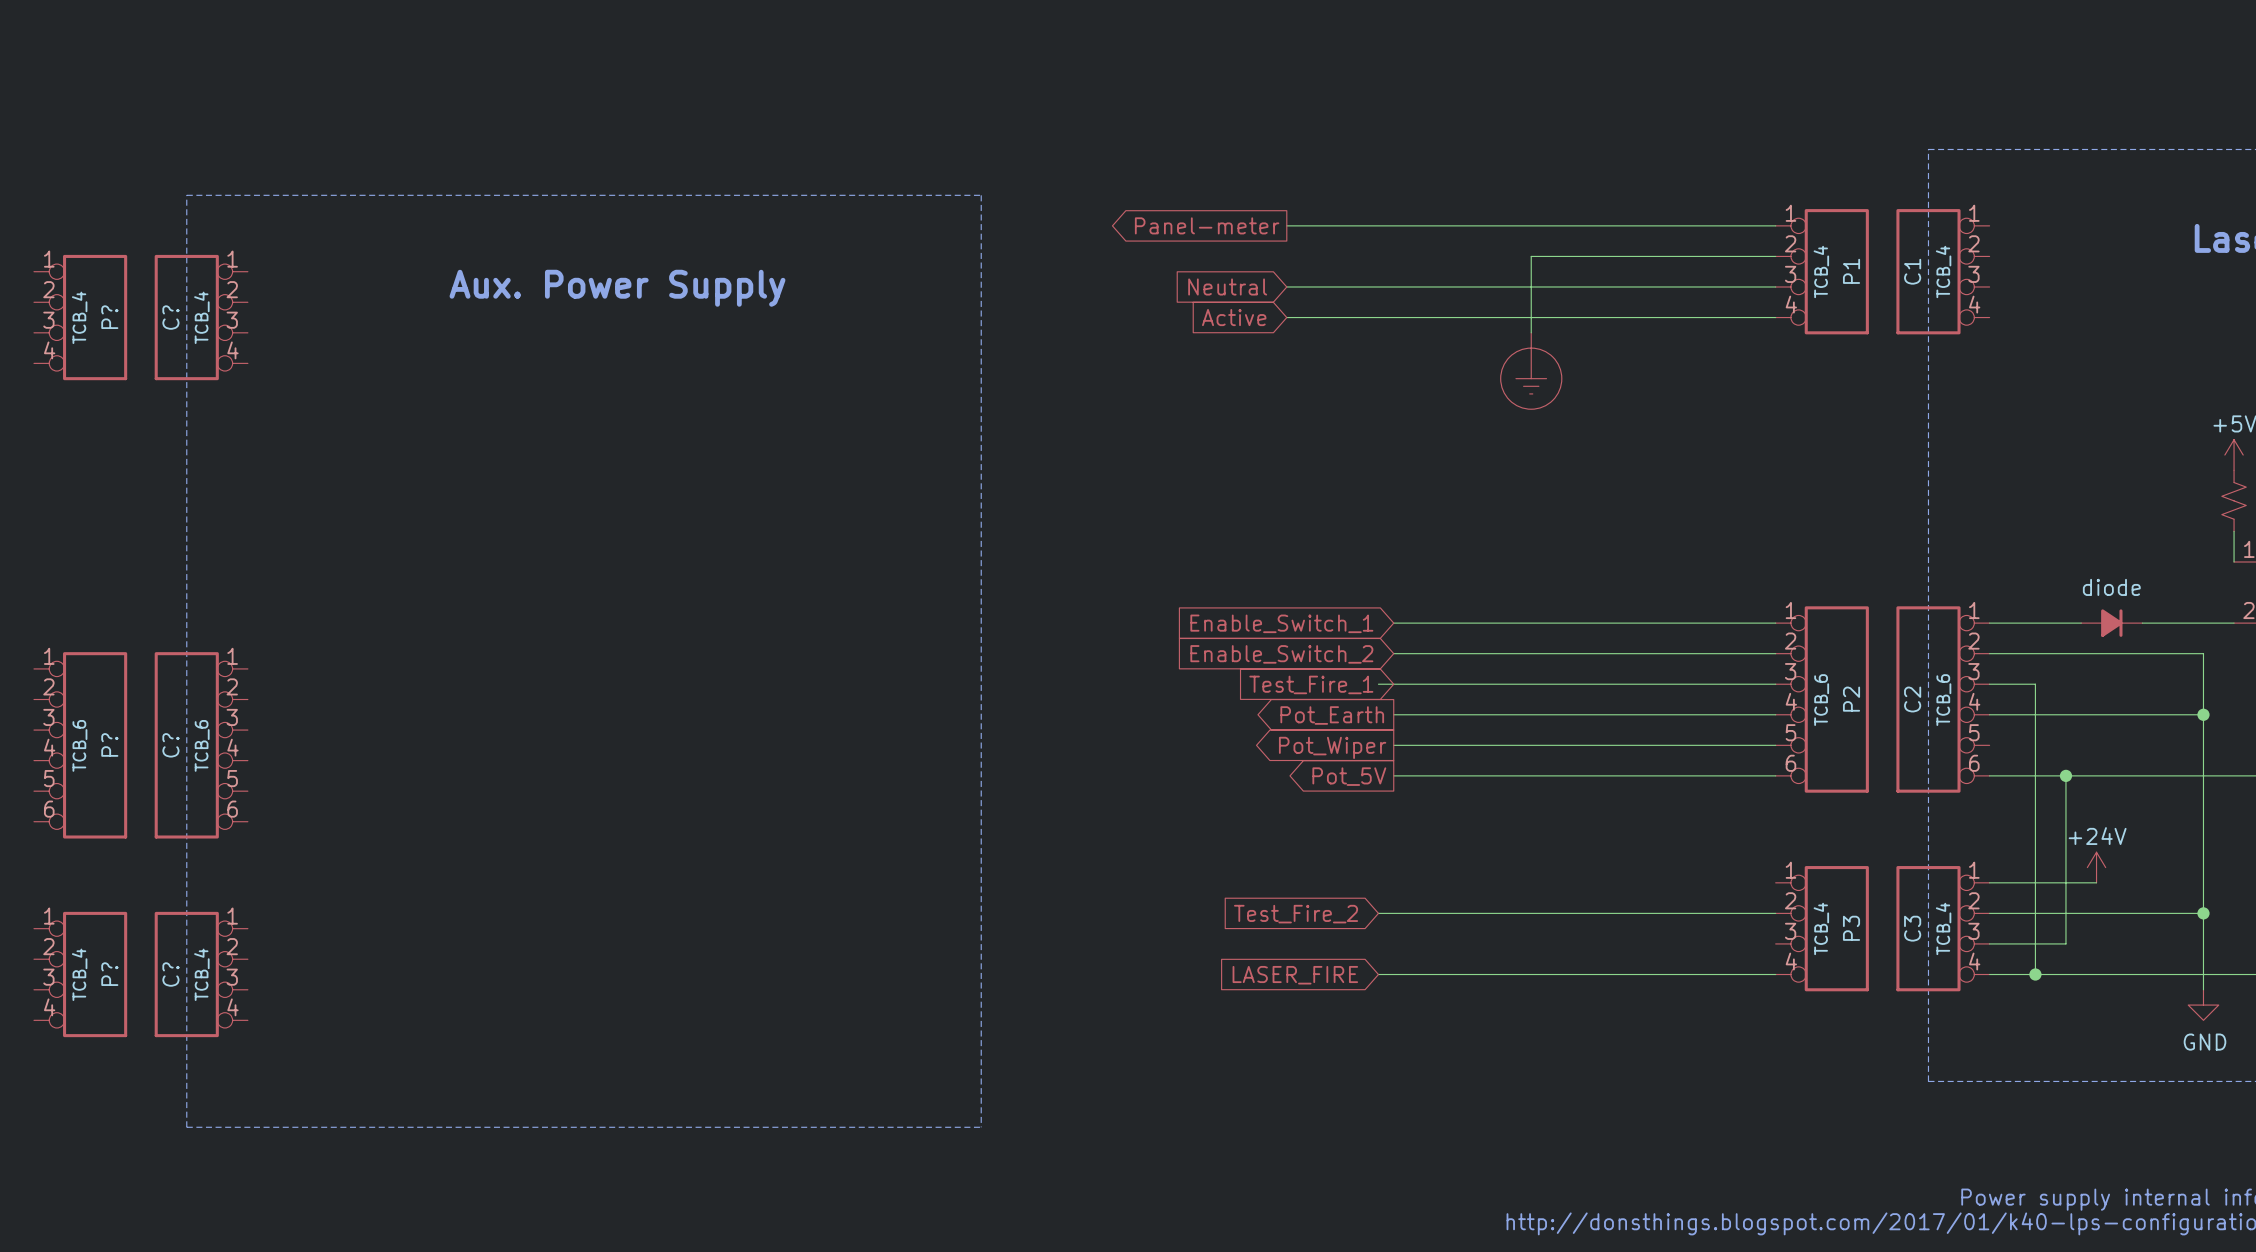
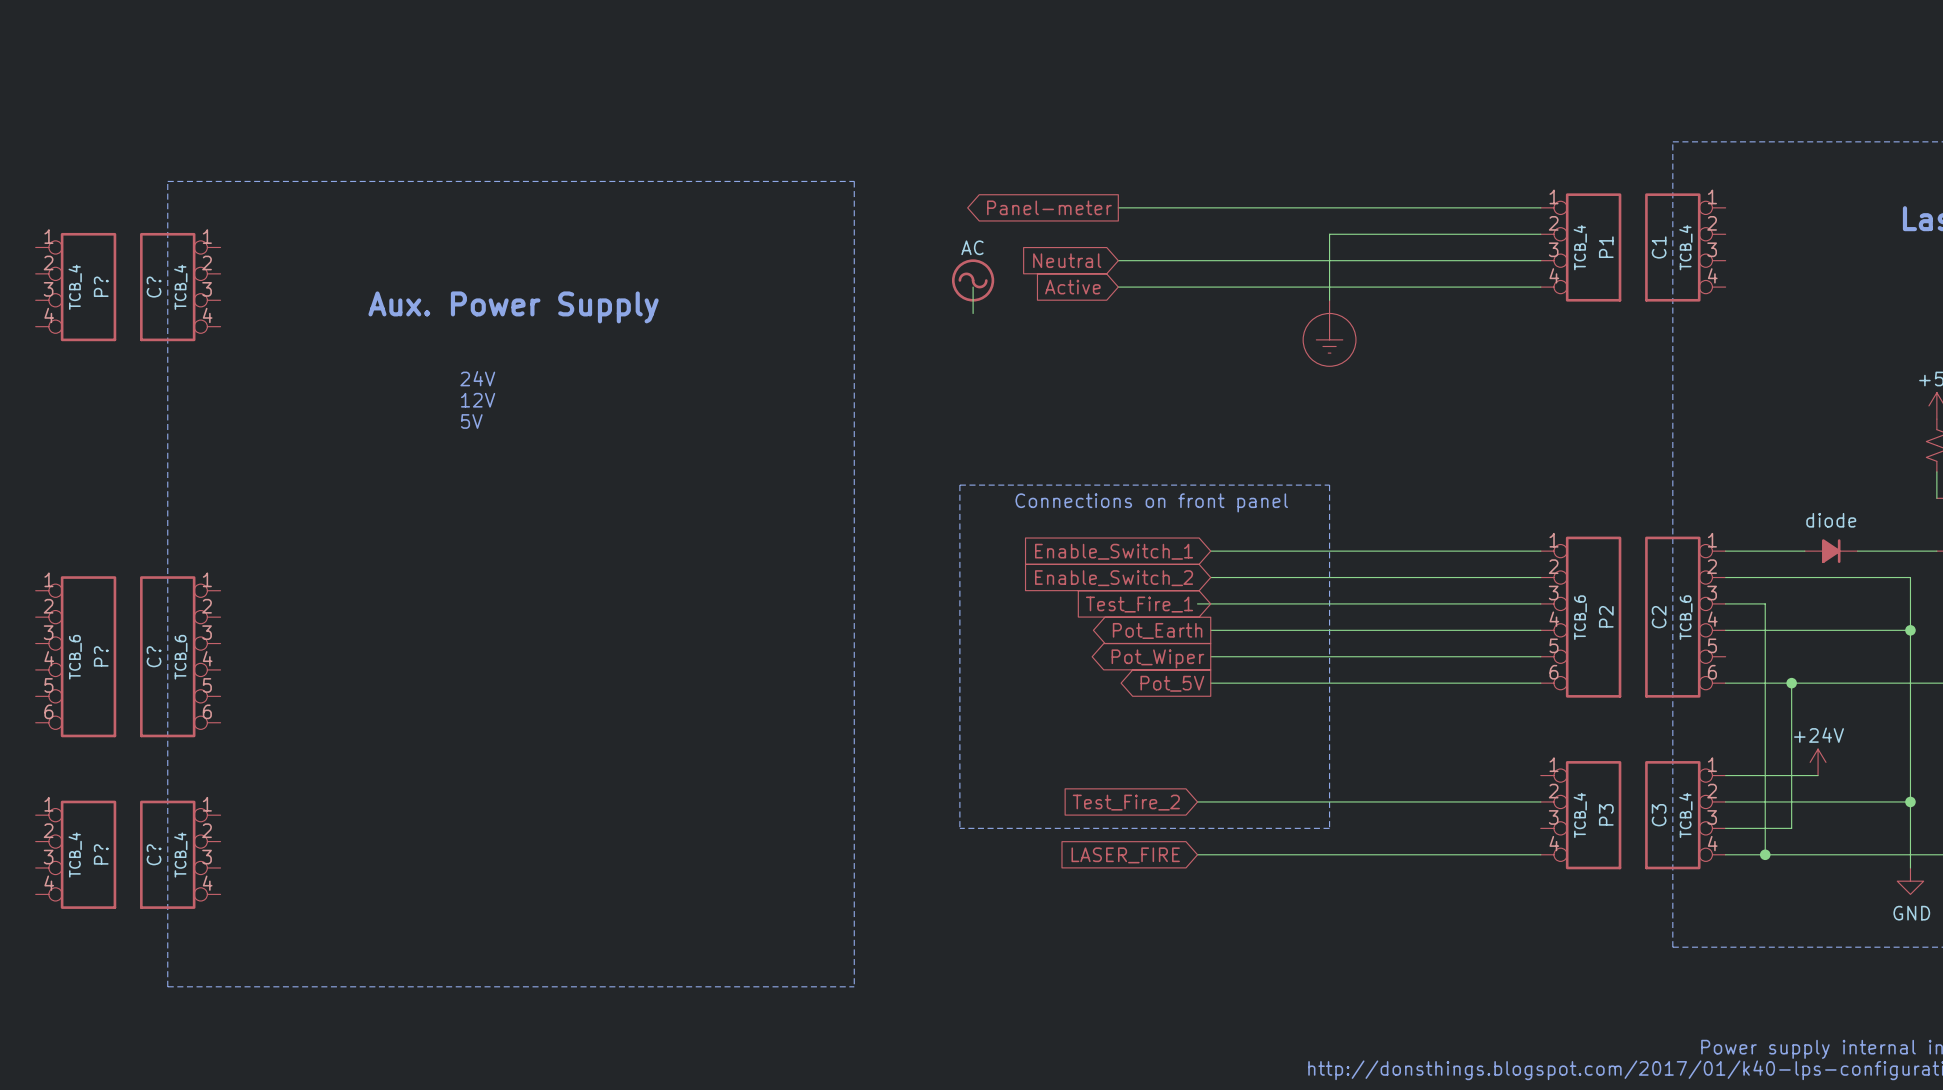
text position: Aux. Power Supply (617, 288) -> Aux. Power Supply (513, 307)
power symbol: none -> AC (973, 280)
wire: none -> (973, 287) (973, 313)
text: none -> 24V (477, 378)
text: none -> 12V (478, 400)
text: none -> 5V (471, 421)
line: none -> (959, 485) (959, 828) (1329, 828) (1329, 485) (959, 485)
text: none -> Connections on front panel (1151, 502)

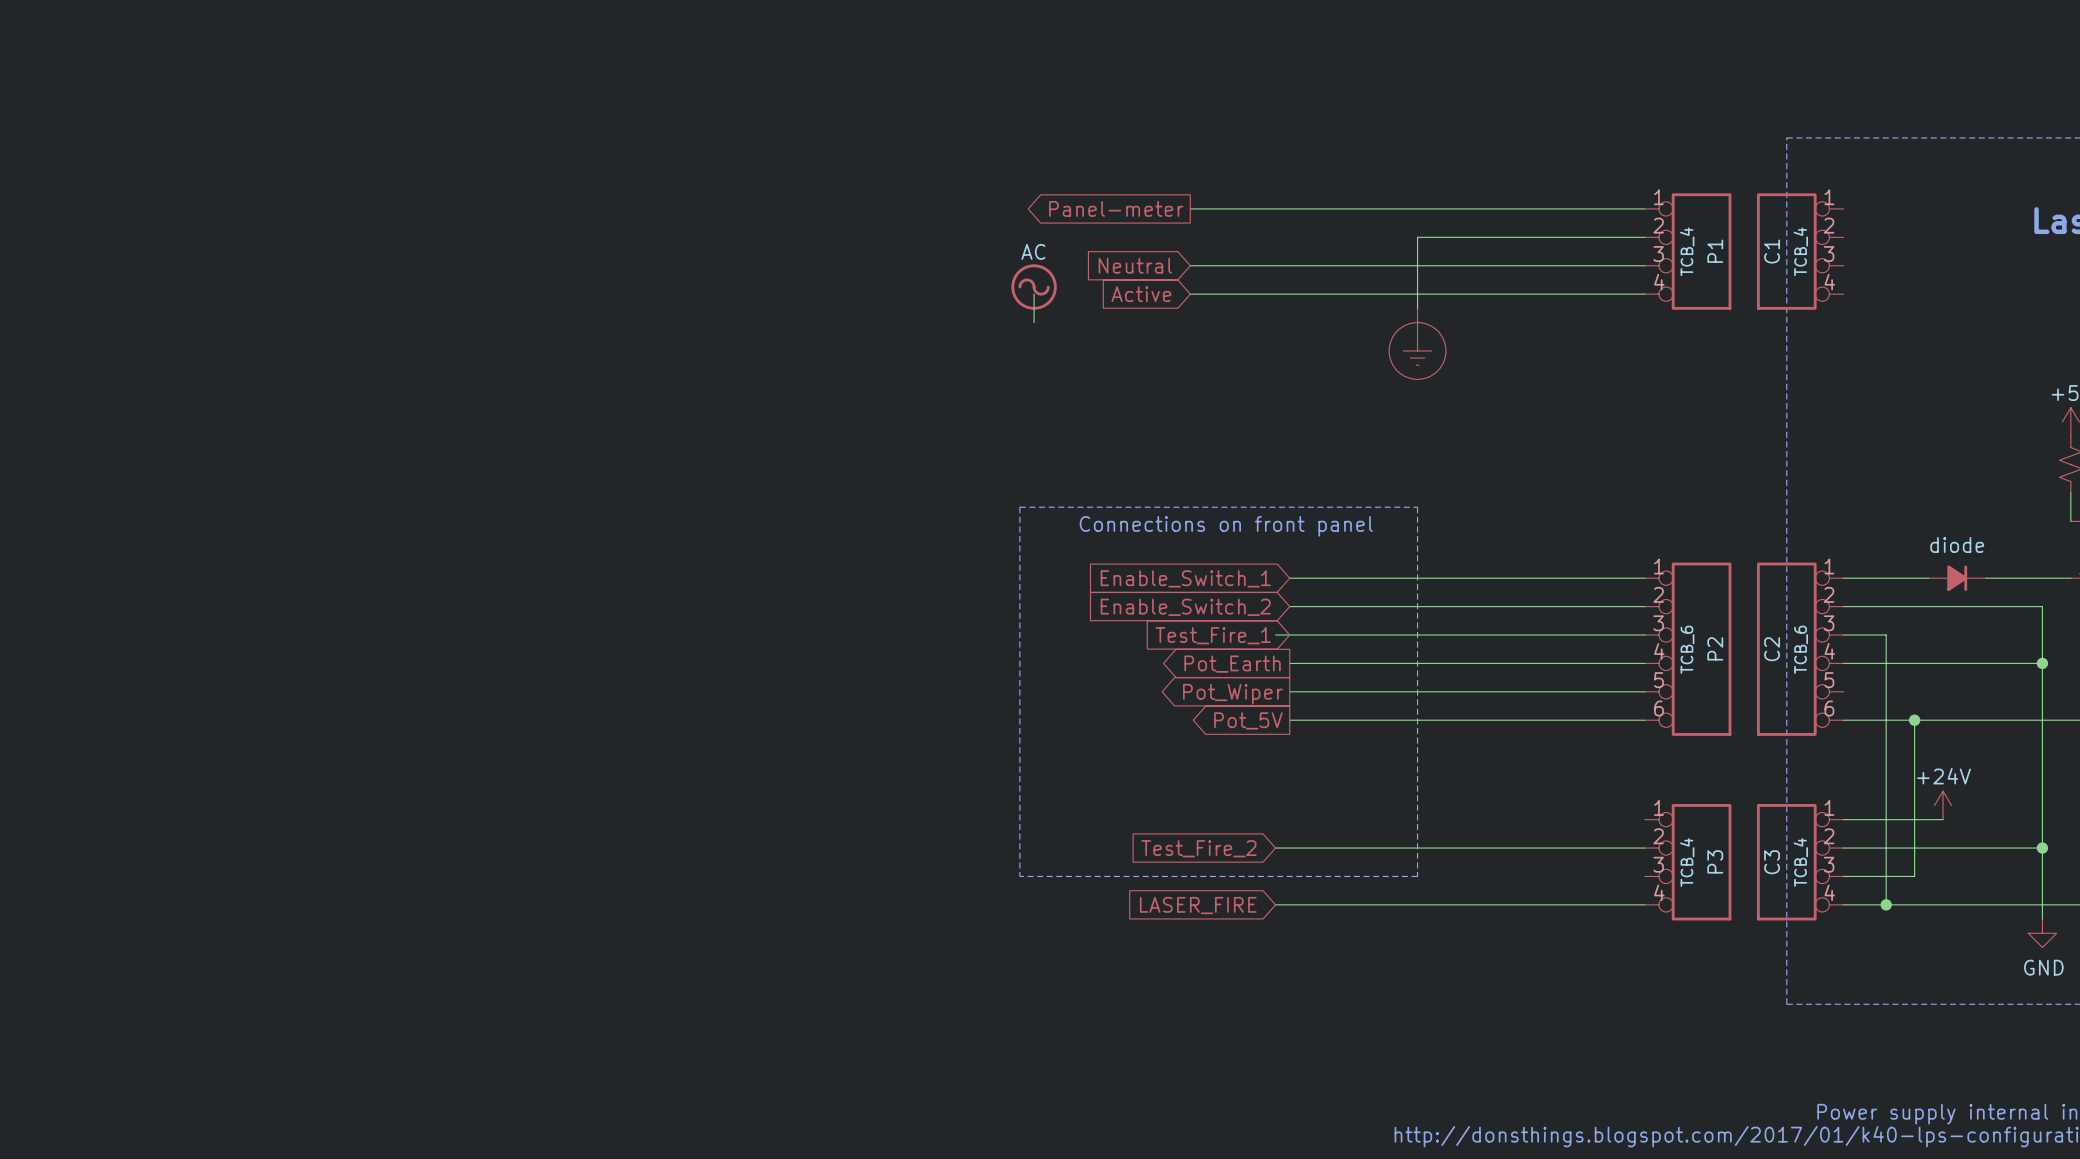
line: (167, 181) (854, 181) (854, 986) (167, 986) (167, 181) -> none
P?: TCB_4 (75, 287) -> none
C?: TCB_4 (180, 287) -> none
text: Aux. Power Supply (513, 307) -> none
text: 24V (477, 378) -> none
text: 12V (478, 400) -> none
text: 5V (471, 421) -> none
P?: TCB_6 (75, 656) -> none
C?: TCB_6 (180, 656) -> none
P?: TCB_4 (75, 854) -> none
C?: TCB_4 (180, 854) -> none

